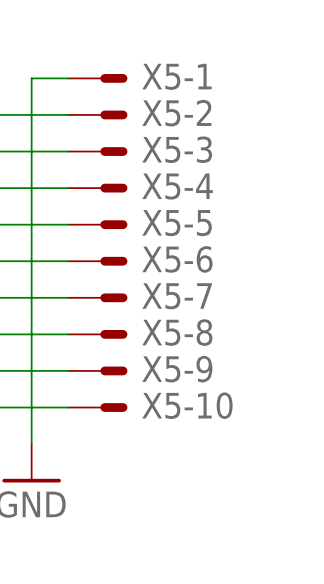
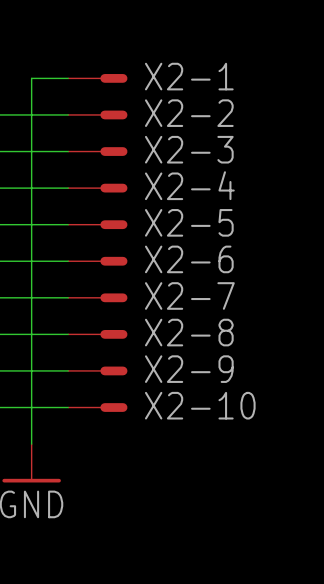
X5-1 name: X5-1 (176, 76) -> X2-1 (189, 76)
X5-2 name: X5-2 (176, 113) -> X2-2 (189, 113)
X5-3 name: X5-3 (177, 149) -> X2-3 (189, 149)
X5-4 name: X5-4 (177, 186) -> X2-4 (189, 185)
X5-5 name: X5-5 (177, 223) -> X2-5 (189, 222)
X5-6 name: X5-6 (177, 259) -> X2-6 (189, 259)
X5-7 name: X5-7 (177, 296) -> X2-7 (189, 295)
X5-8 name: X5-8 (177, 332) -> X2-8 (189, 332)
X5-9 name: X5-9 (177, 369) -> X2-9 (189, 369)
X5-10 name: X5-10 (187, 405) -> X2-10 (200, 405)

